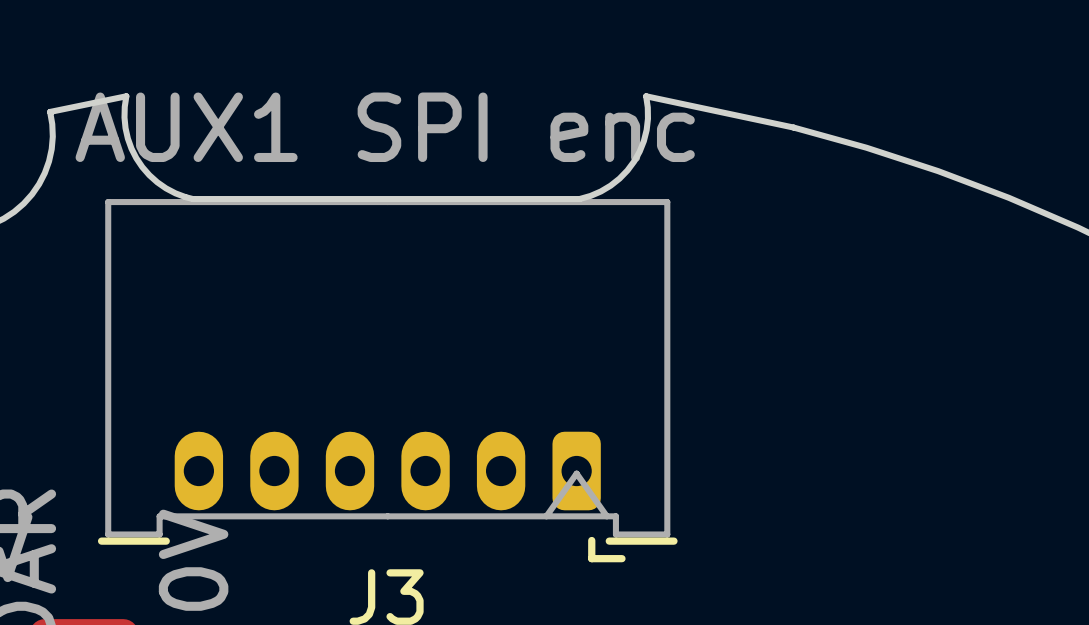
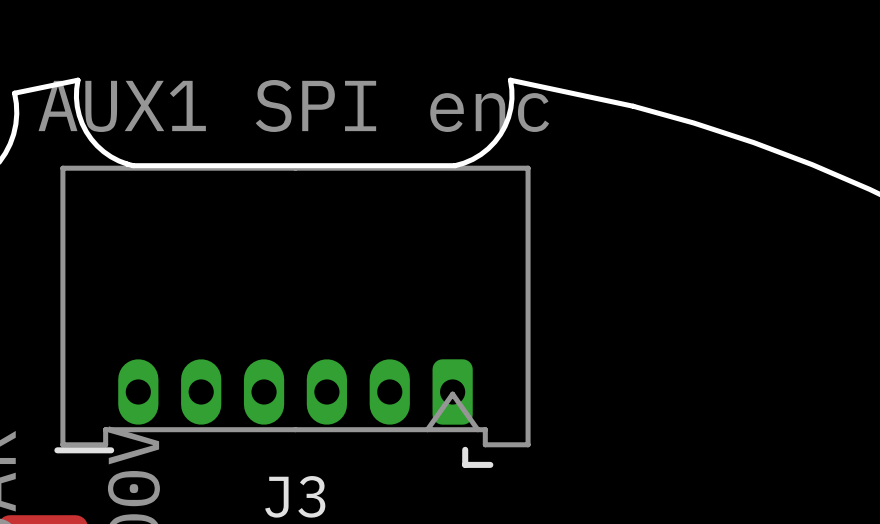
J3 footprint: [97, 199, 678, 563] -> [54, 165, 531, 468]

